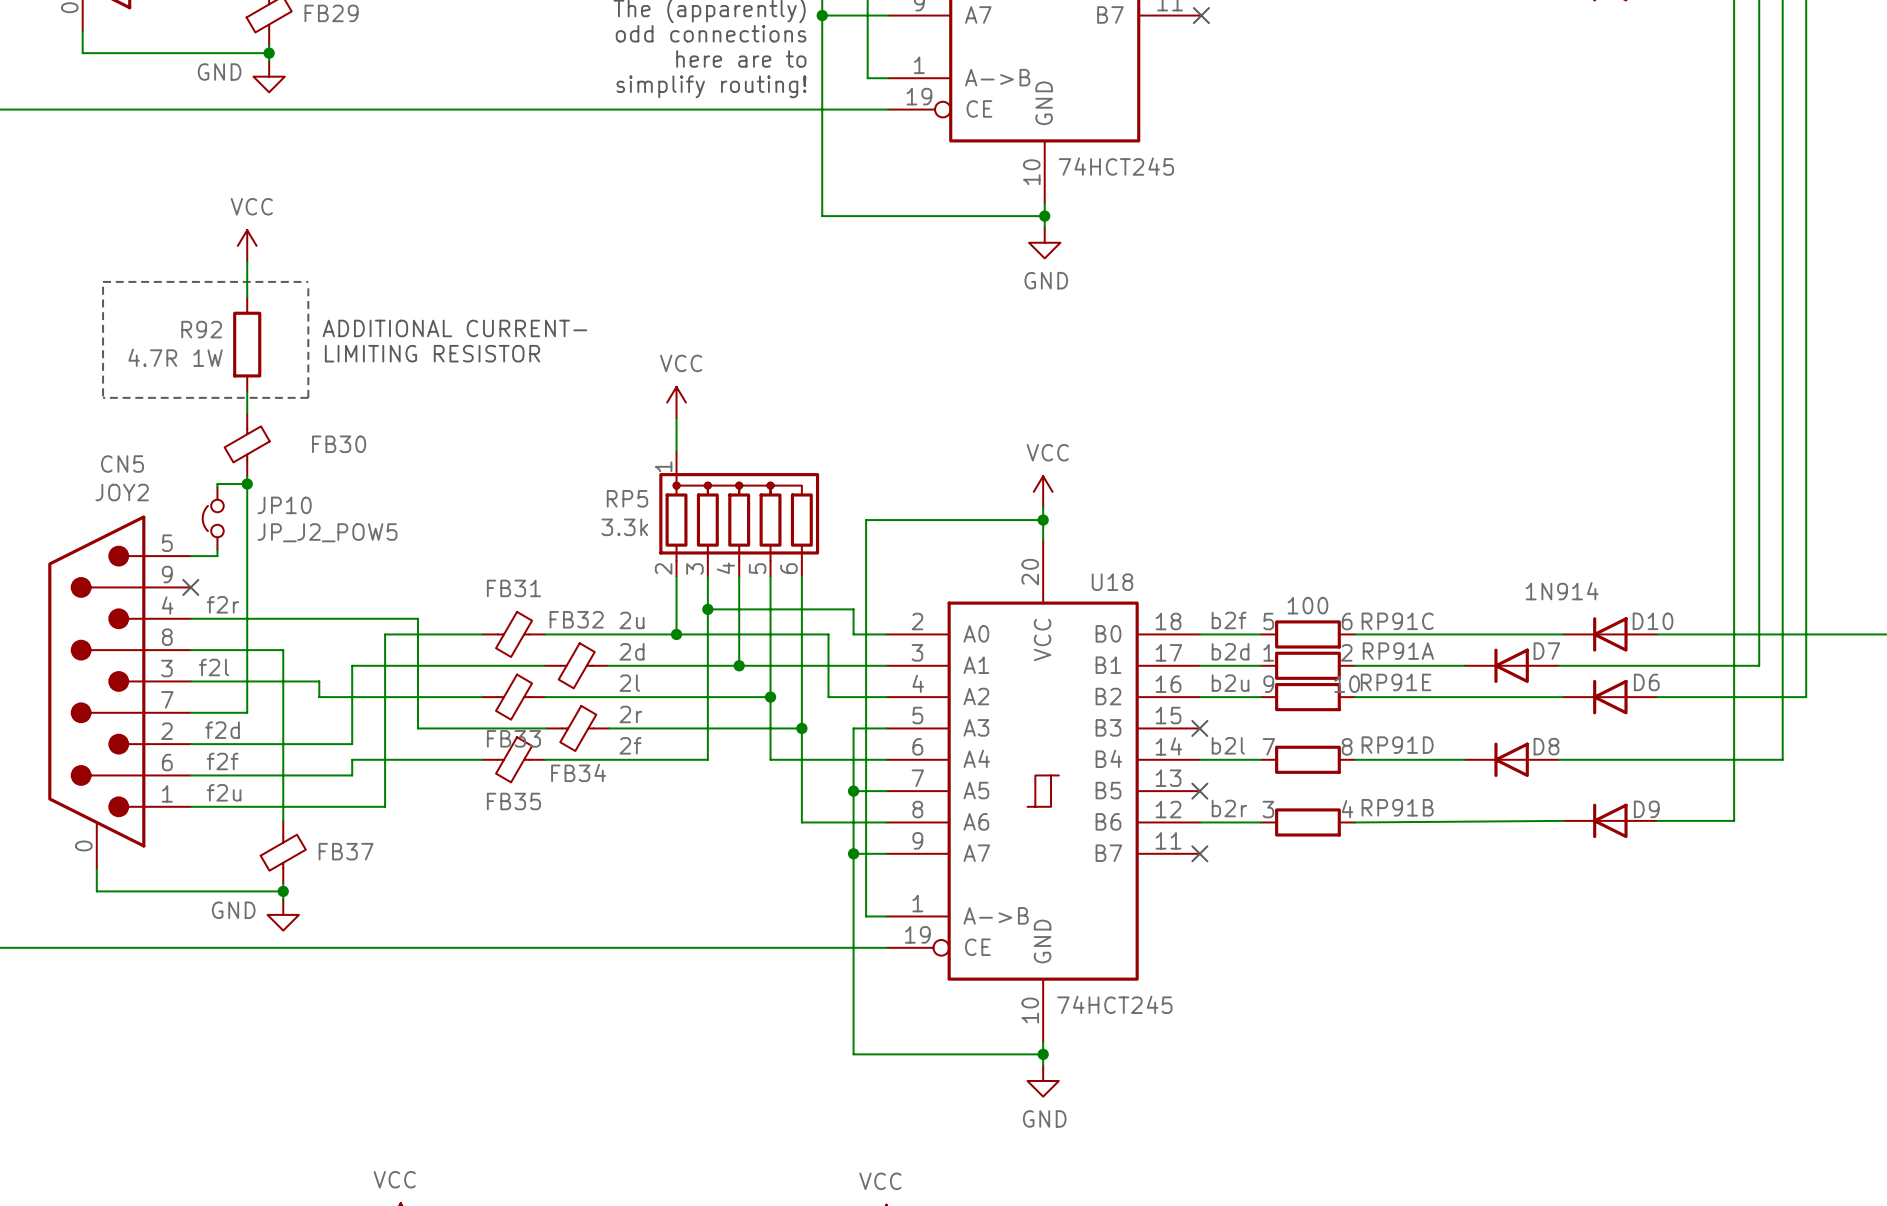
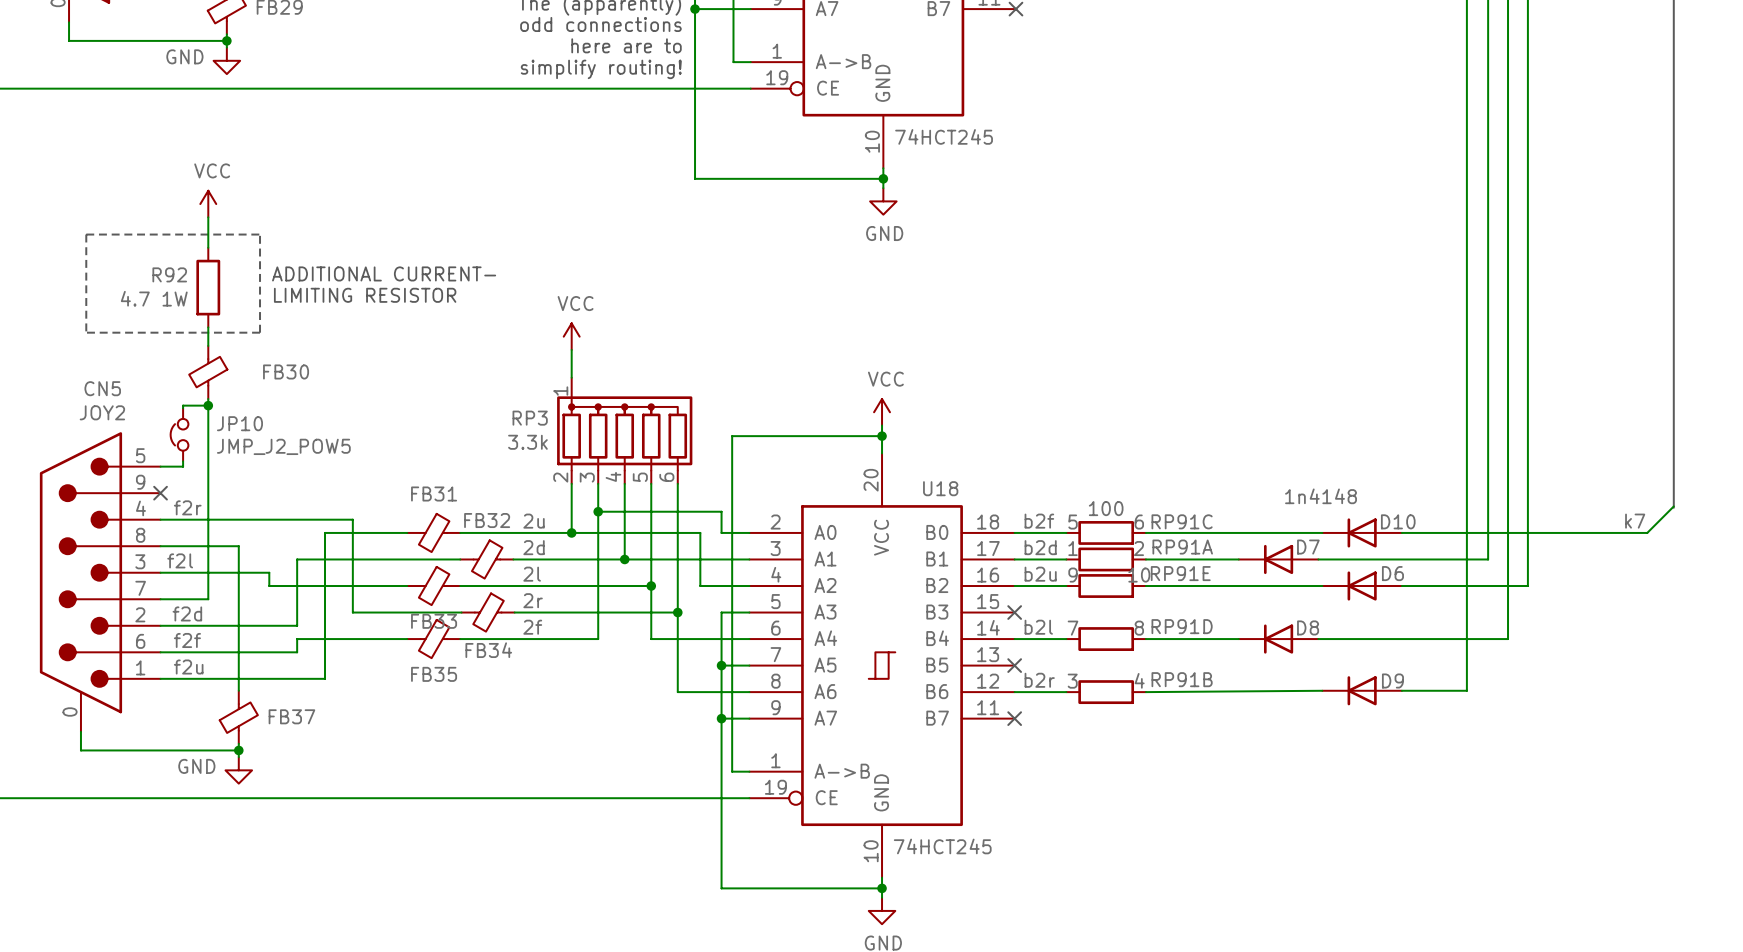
R92 value: 4.7R 1W (175, 357) -> 4.7 1W (154, 298)
RP5 name: RP5 (627, 498) -> RP3 (530, 418)
JP10 value: JP_J2_POW5 (327, 532) -> JMP_J2_POW5 (283, 446)
D10 value: 1N914 (1562, 591) -> 1n4148 (1321, 496)

